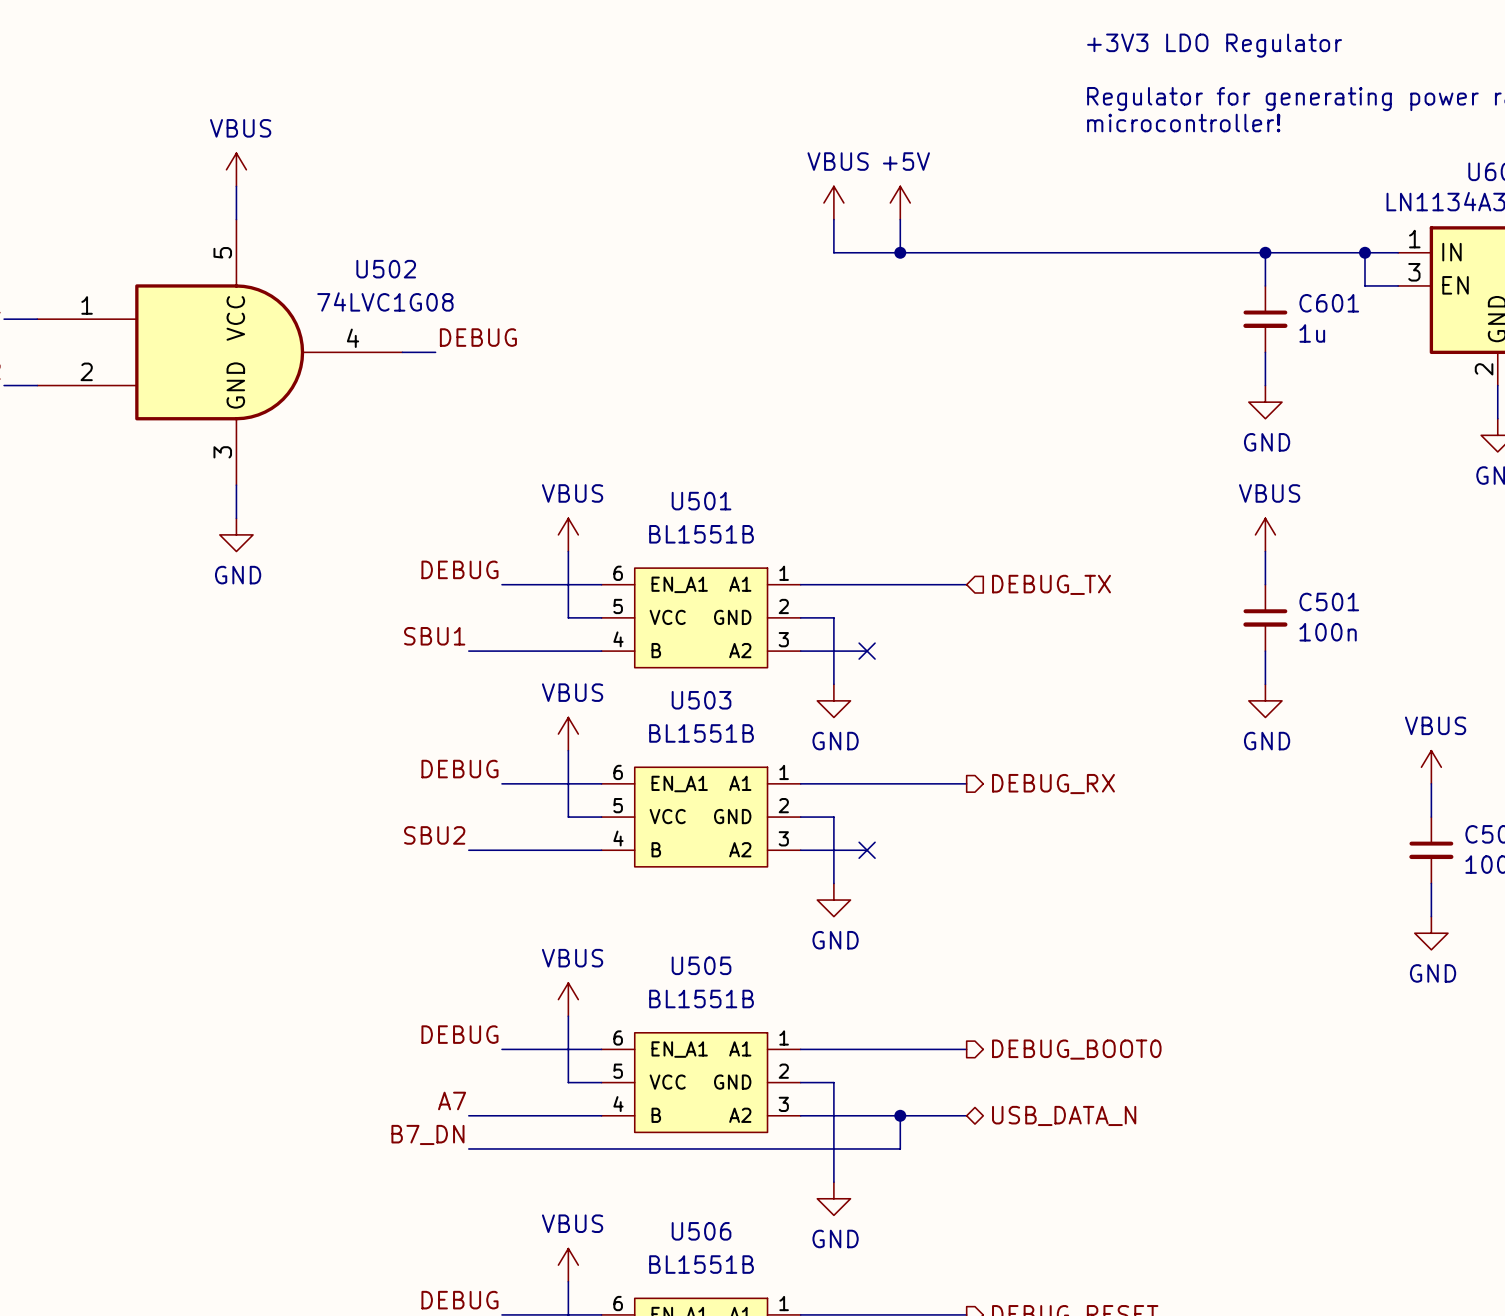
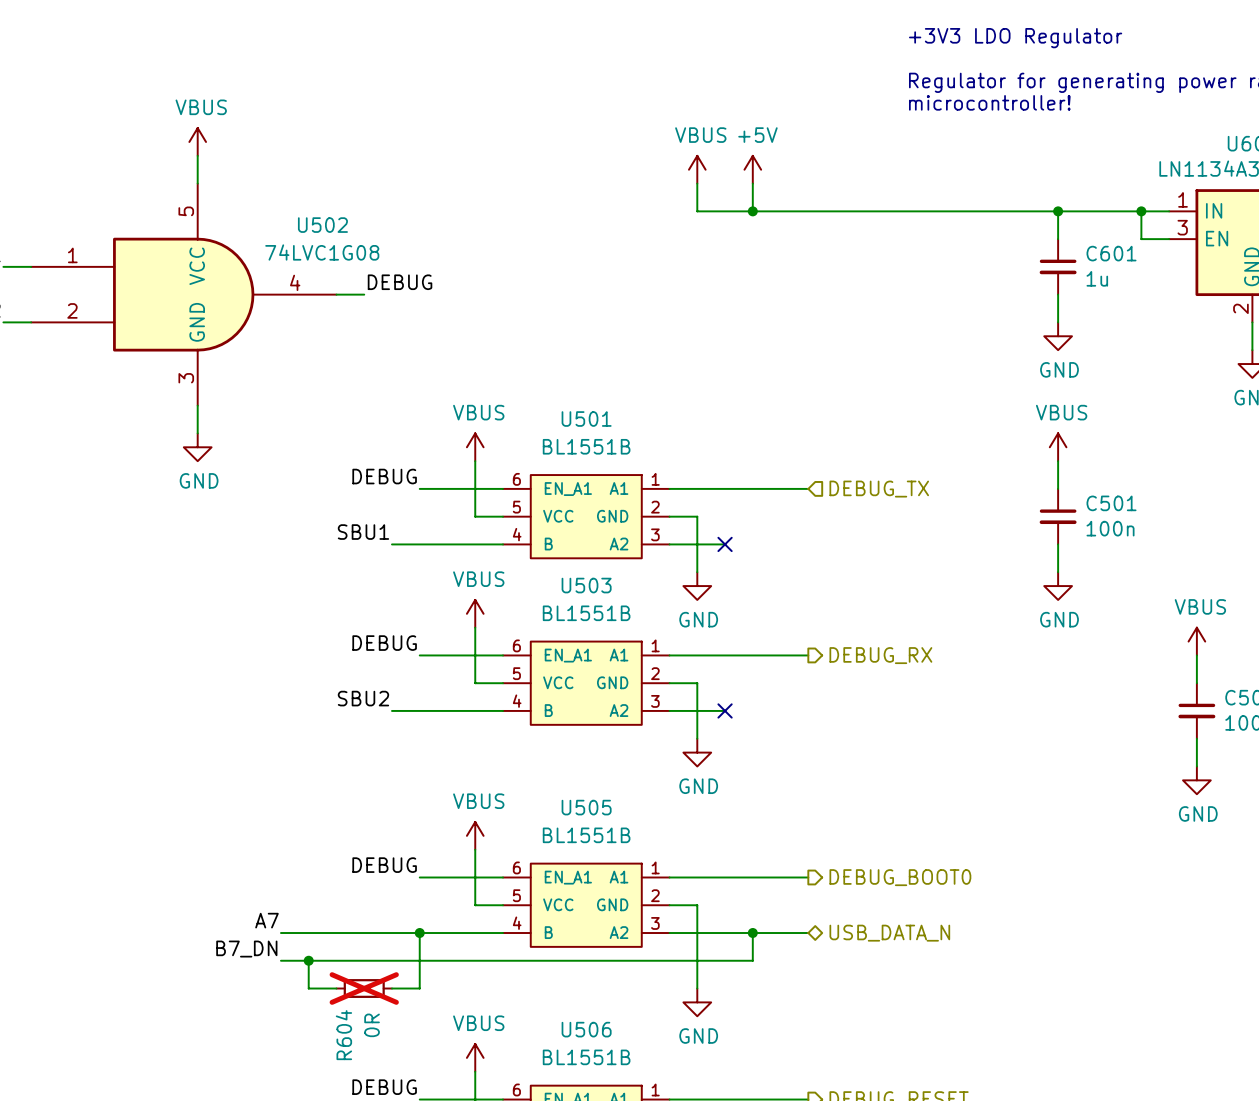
label position: A7 (452, 1100) -> A7 (266, 920)
wire: none -> (280, 933) (391, 933)
wire: none -> (419, 933) (419, 988) (391, 988)
junction: none -> (419, 933)
label position: B7_DN (427, 1134) -> B7_DN (246, 949)
wire: none -> (280, 960) (391, 960)
wire: none -> (308, 960) (308, 988) (336, 988)
junction: none -> (308, 960)
R604: none -> 0R (364, 988)

